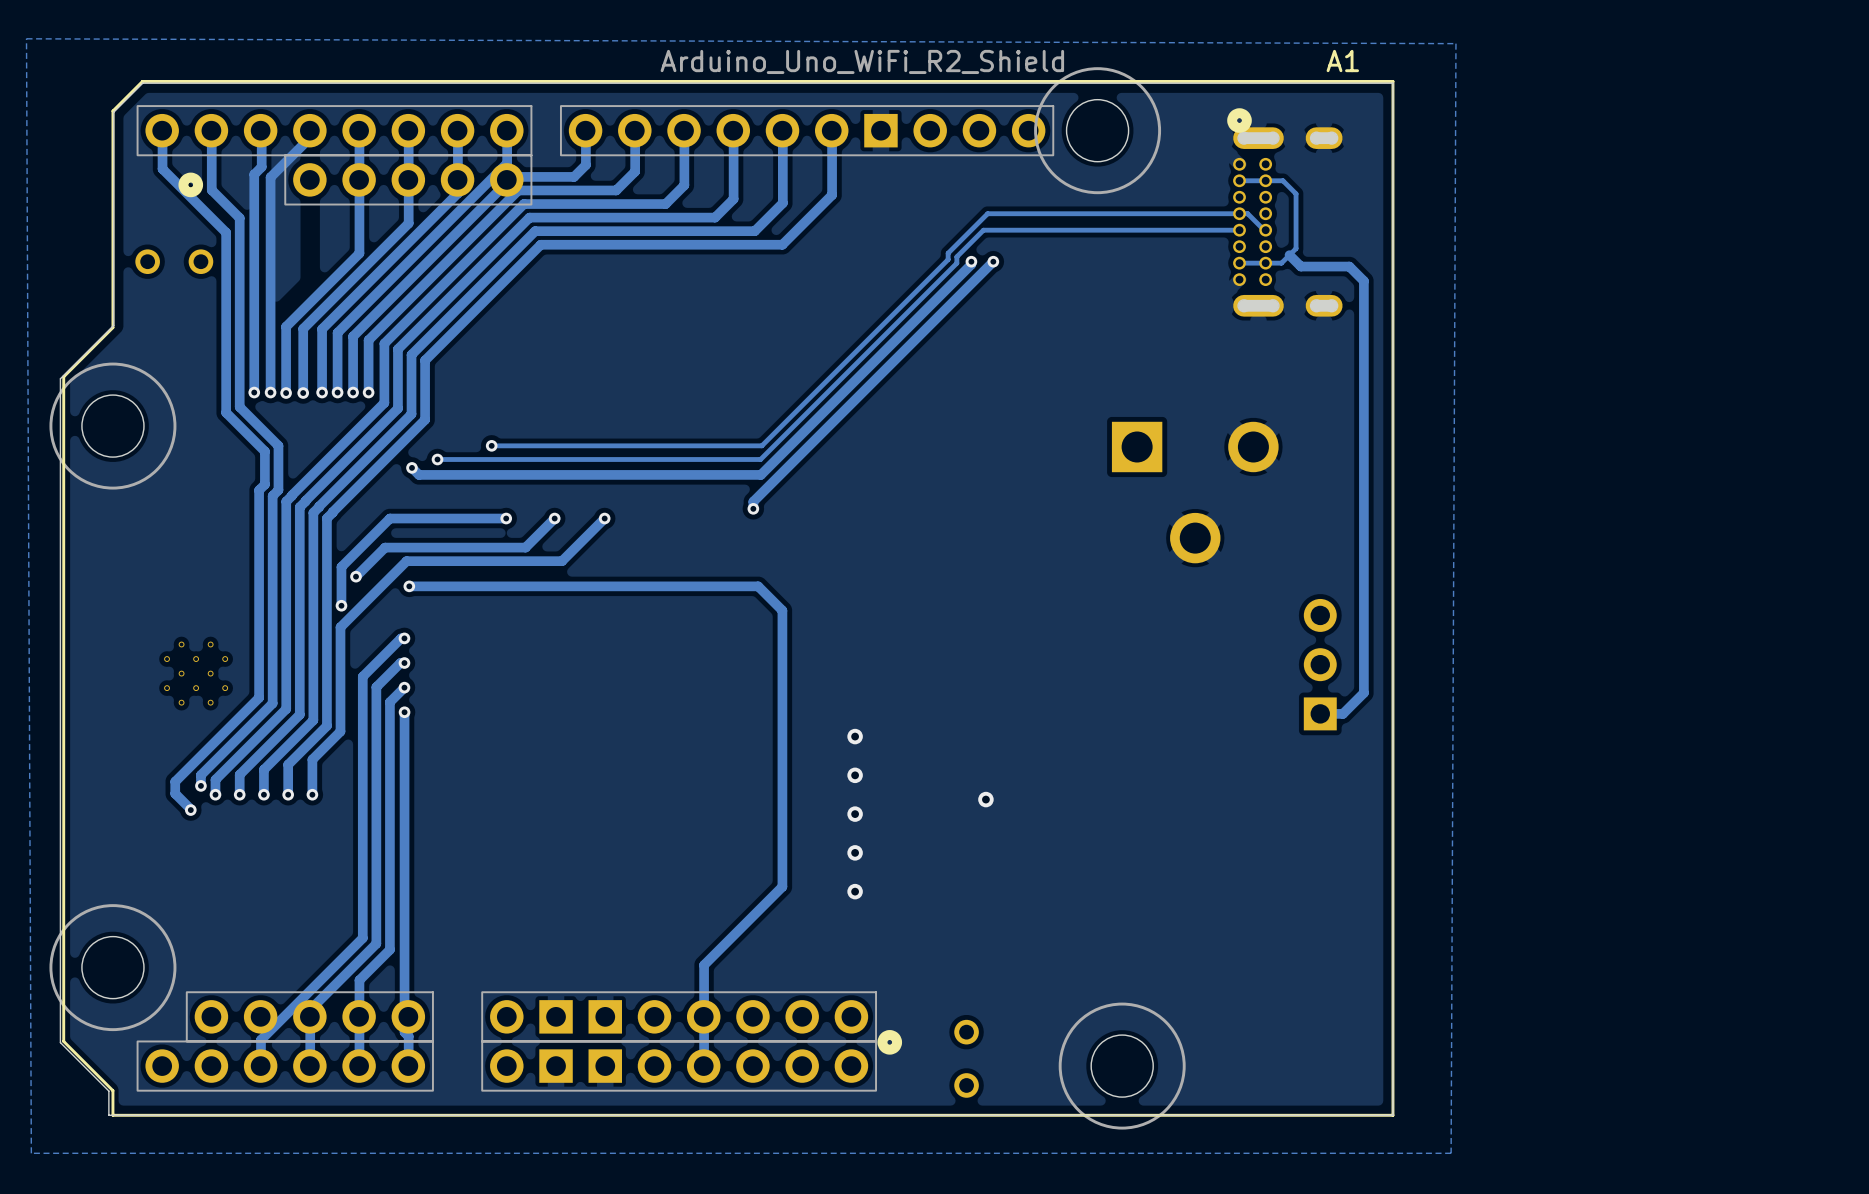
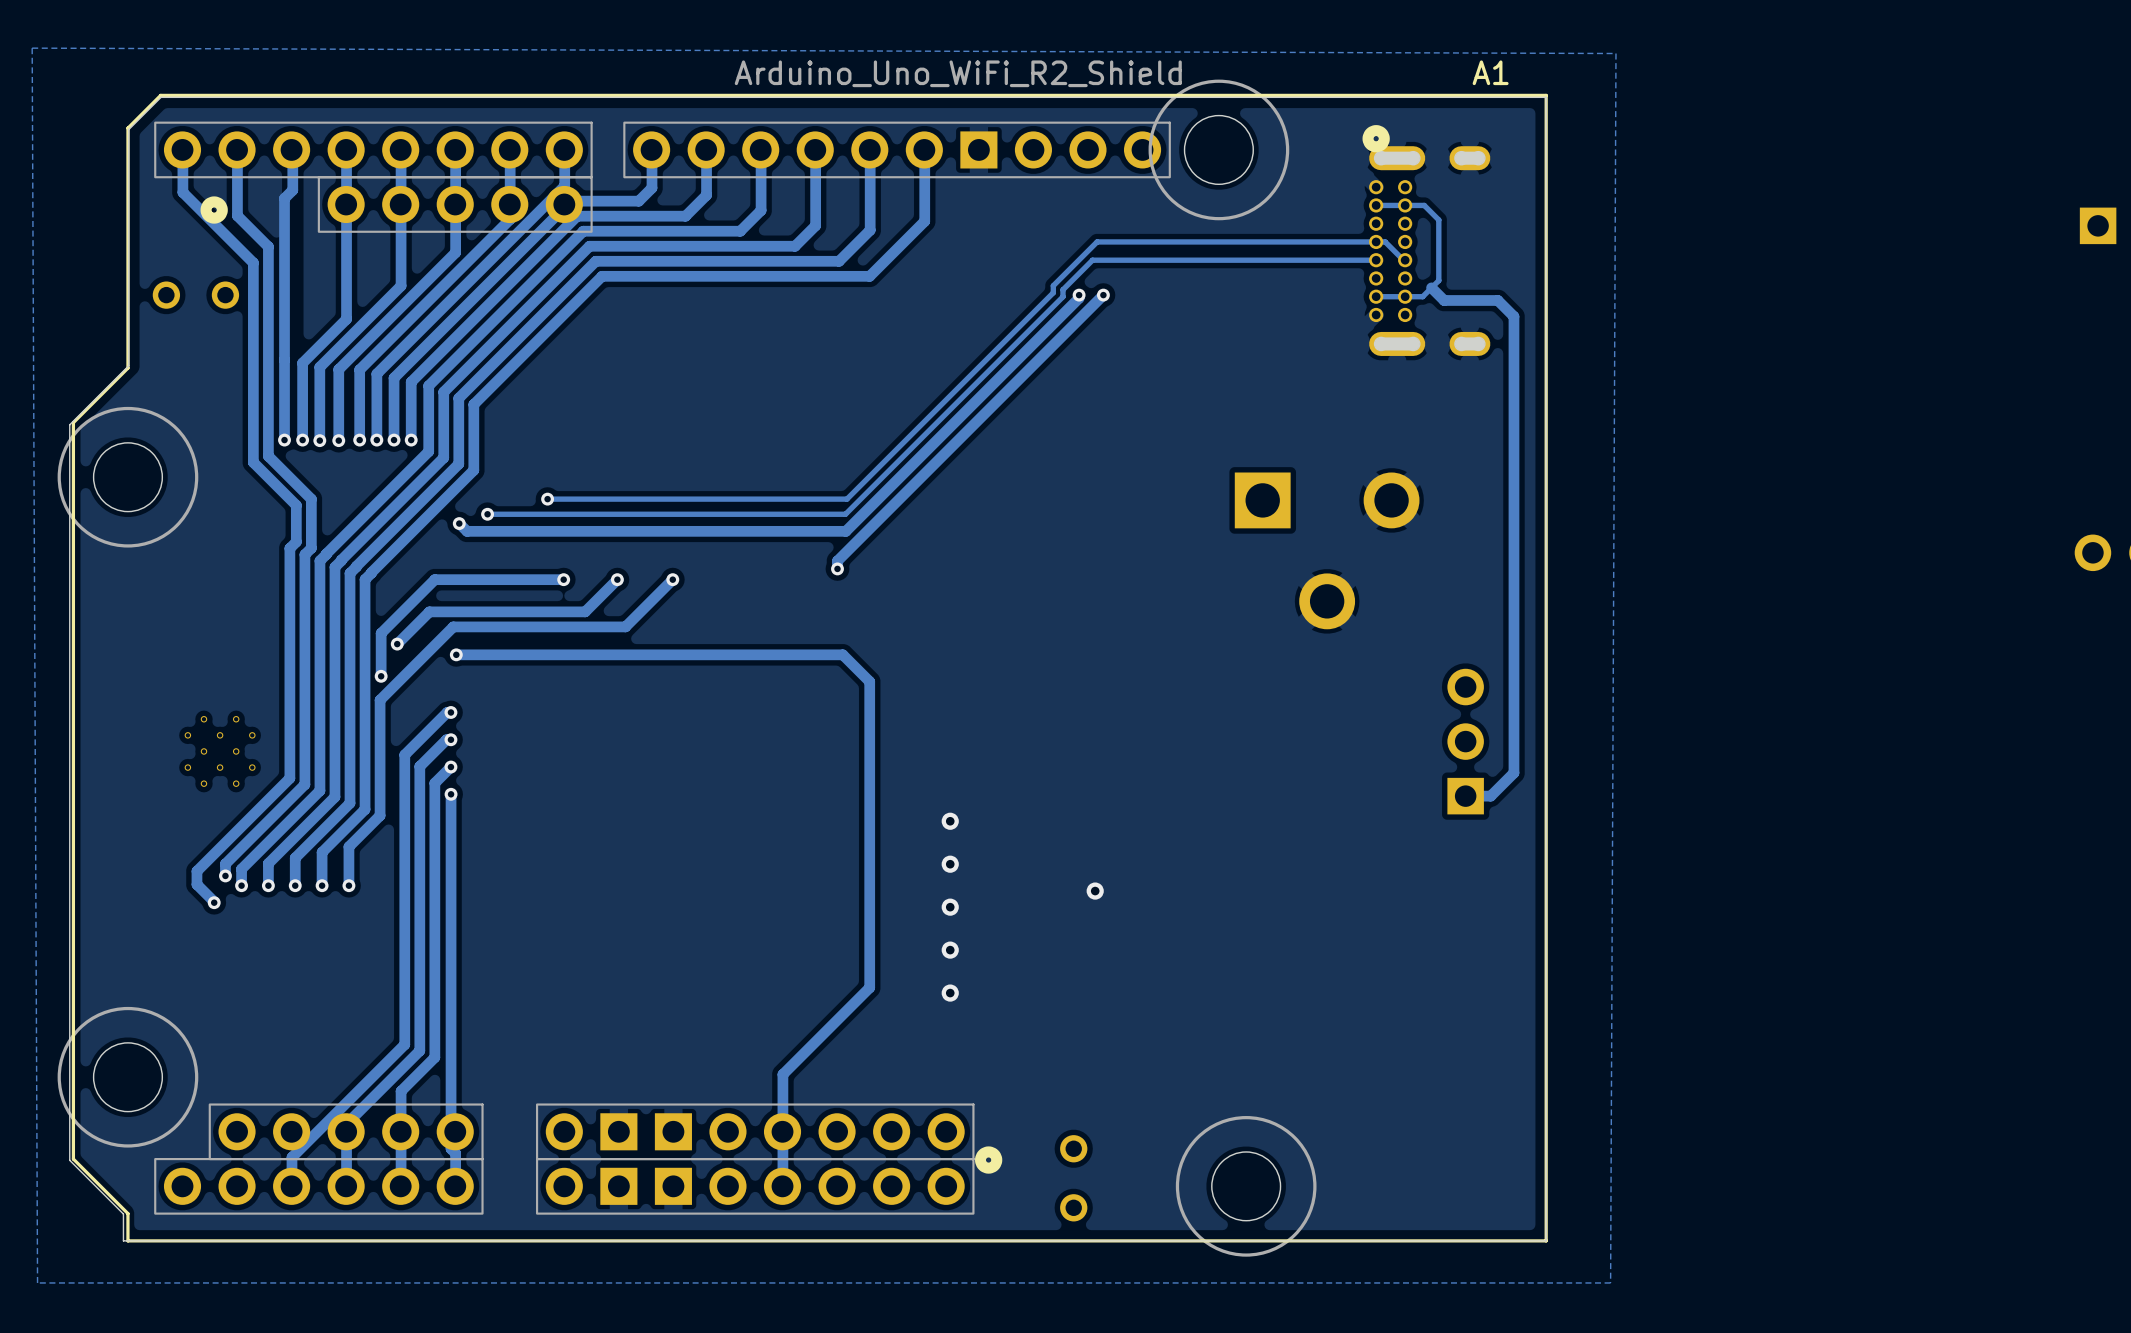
track: (310, 137) (270, 177) (270, 323) -> (346, 157) (346, 319) (302, 363)

